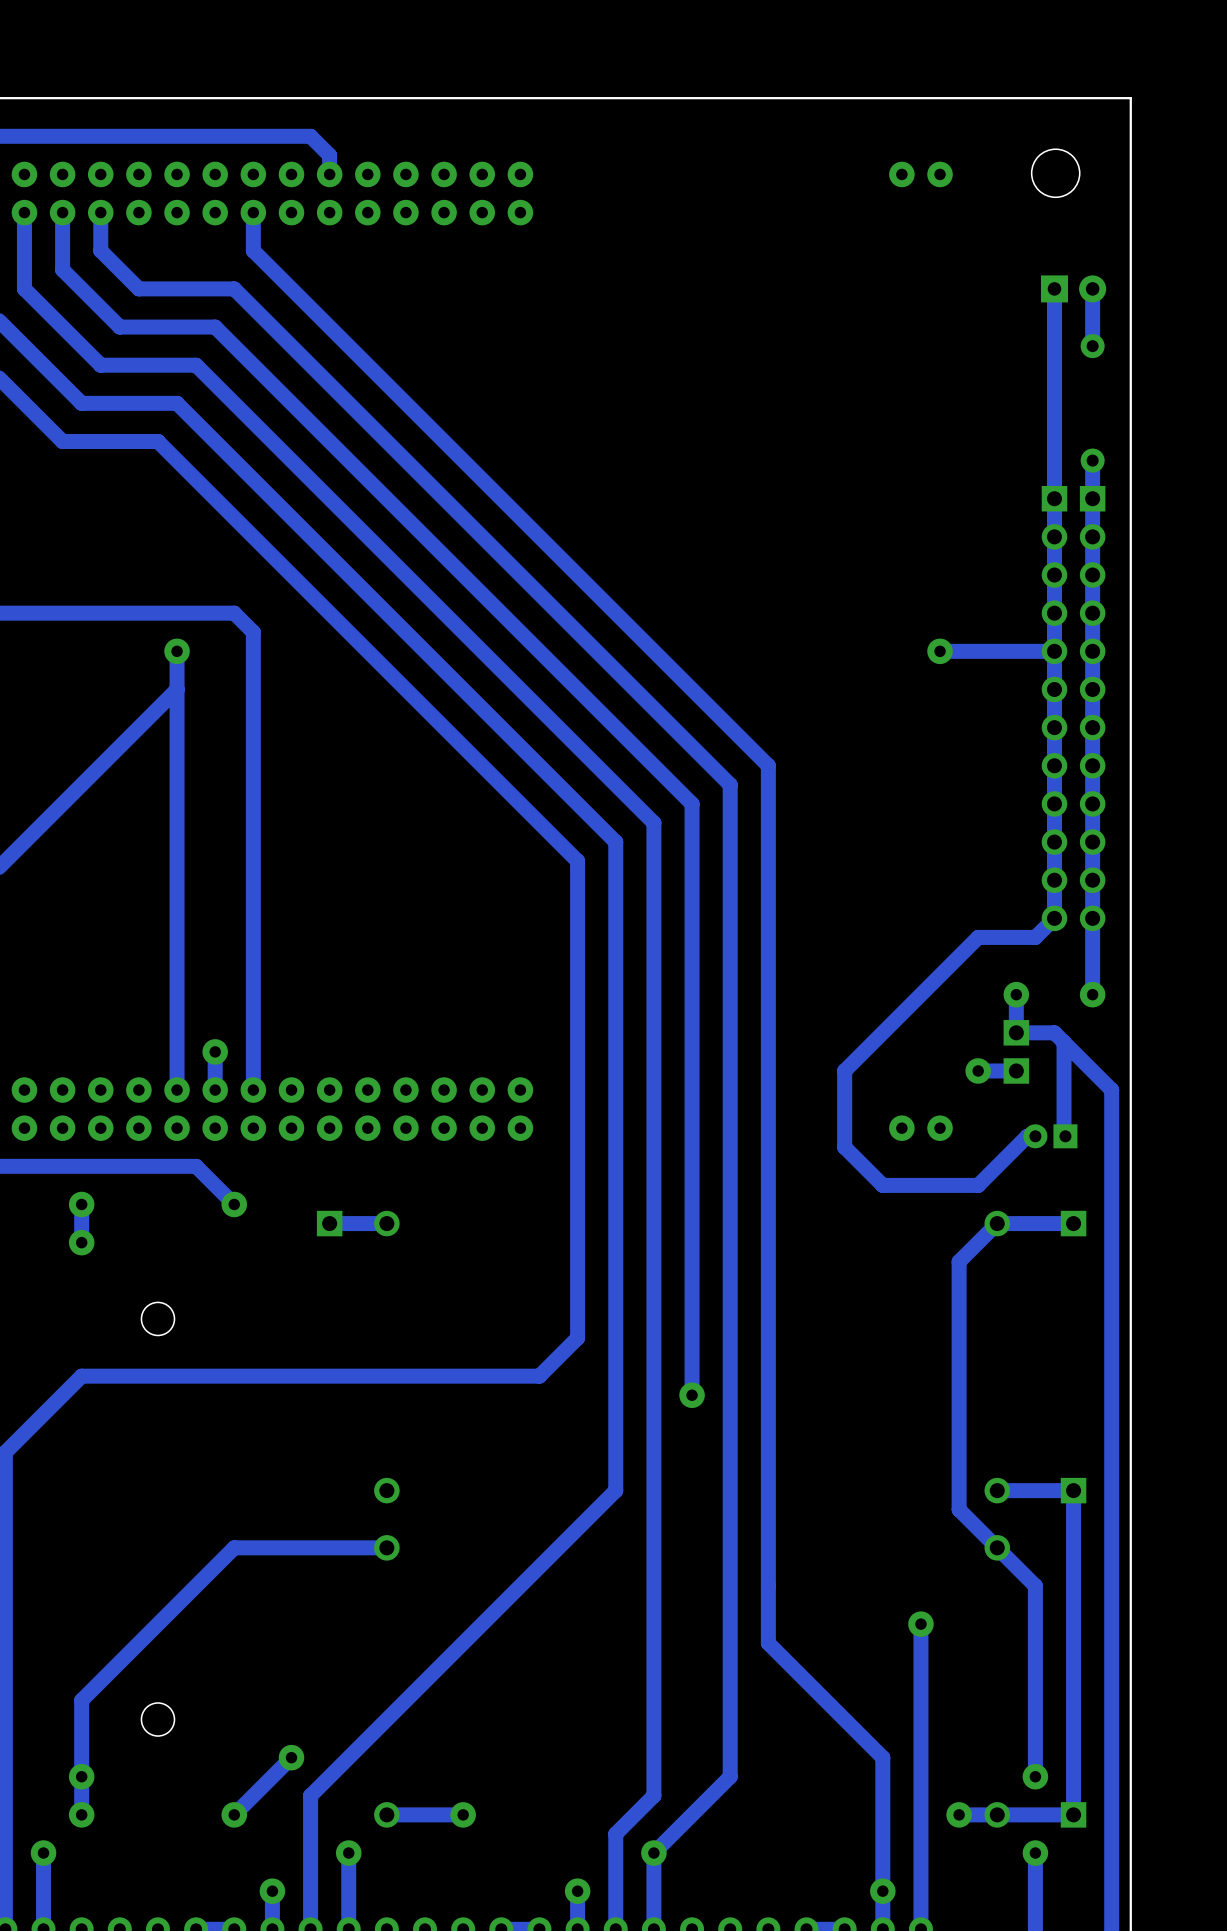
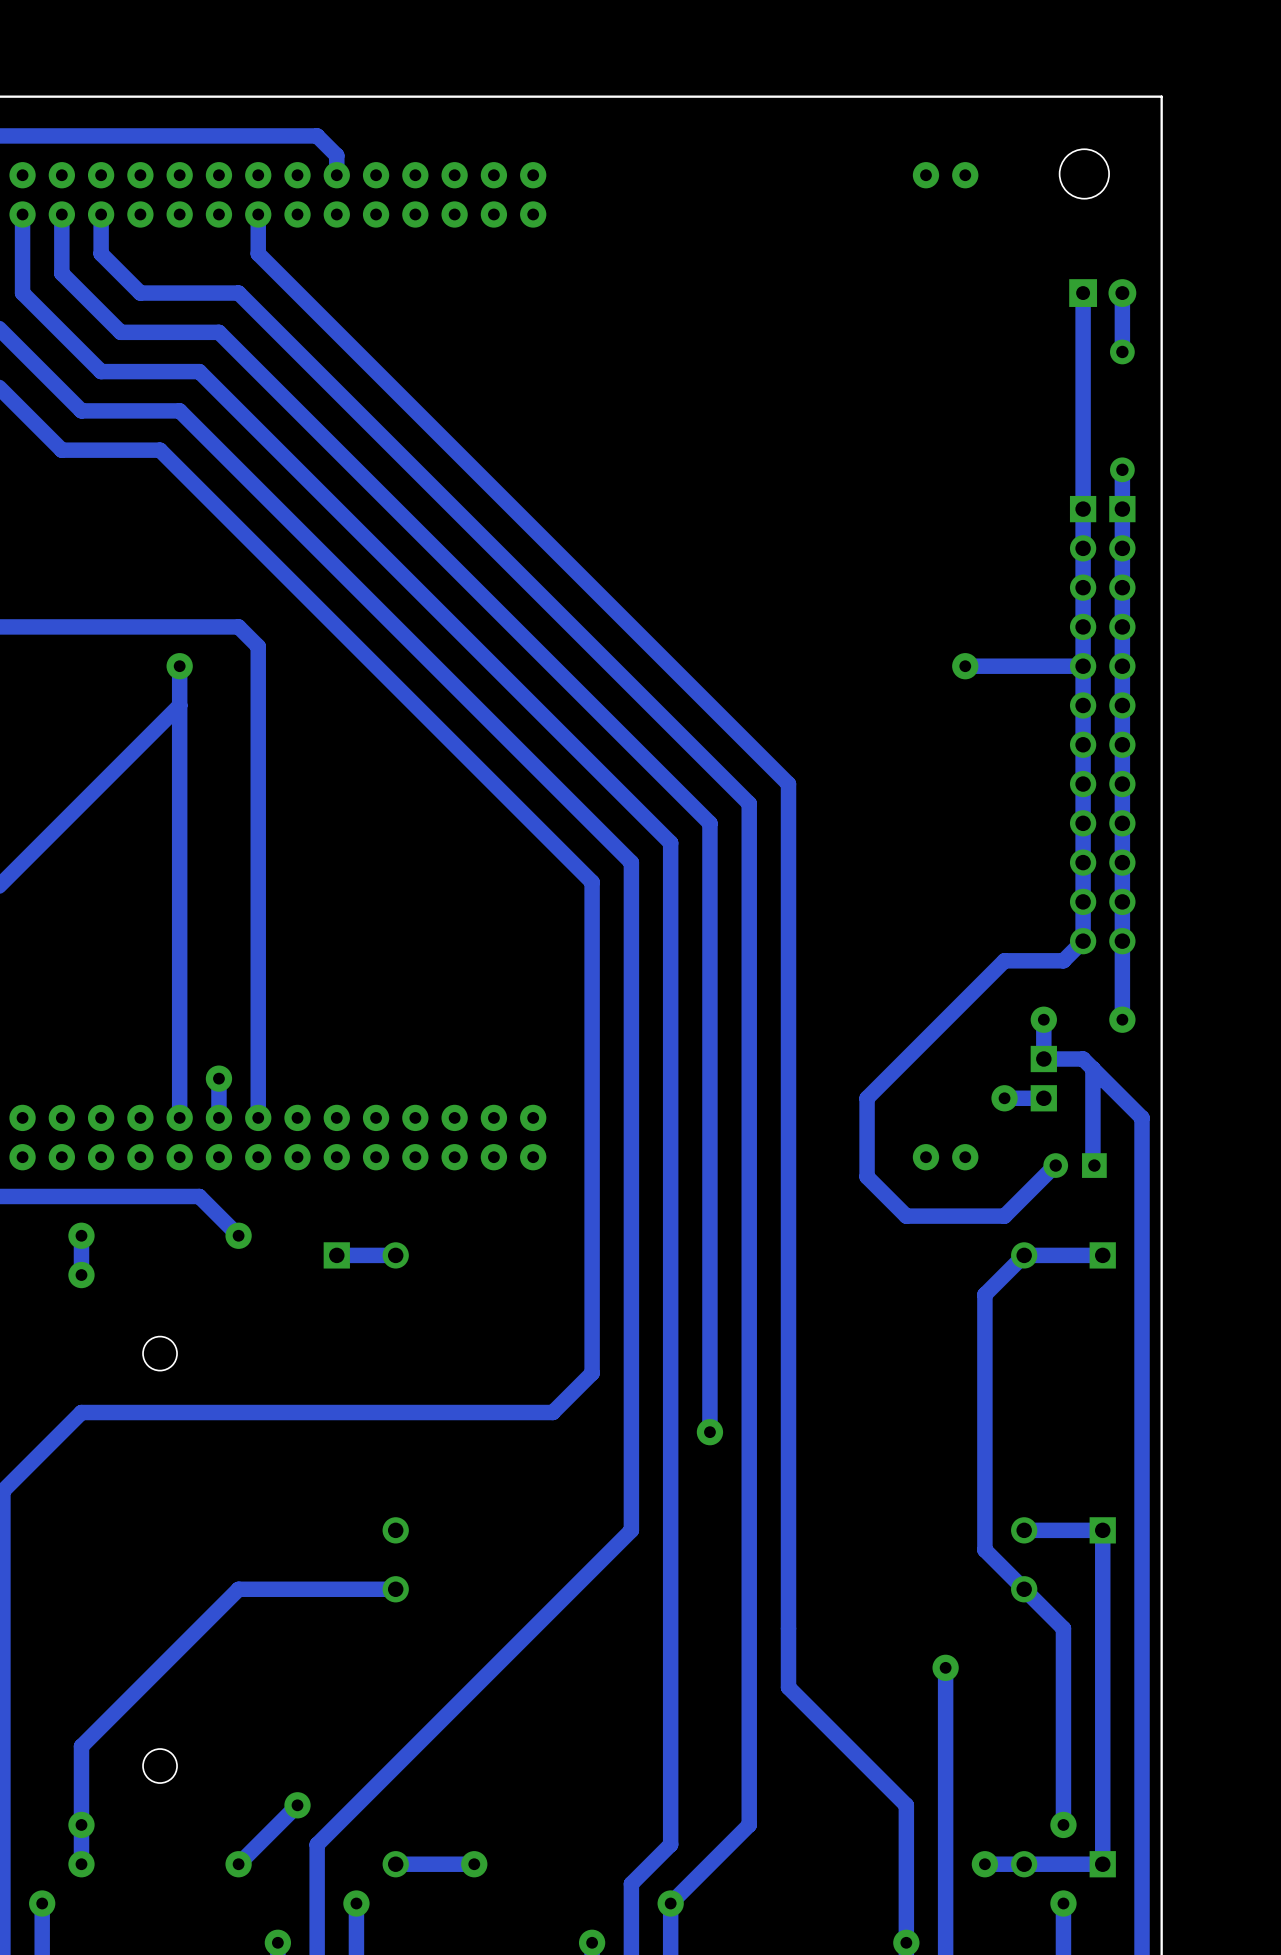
part footprint: [1023, 1124, 1078, 1149] -> [1043, 1153, 1107, 1178]

